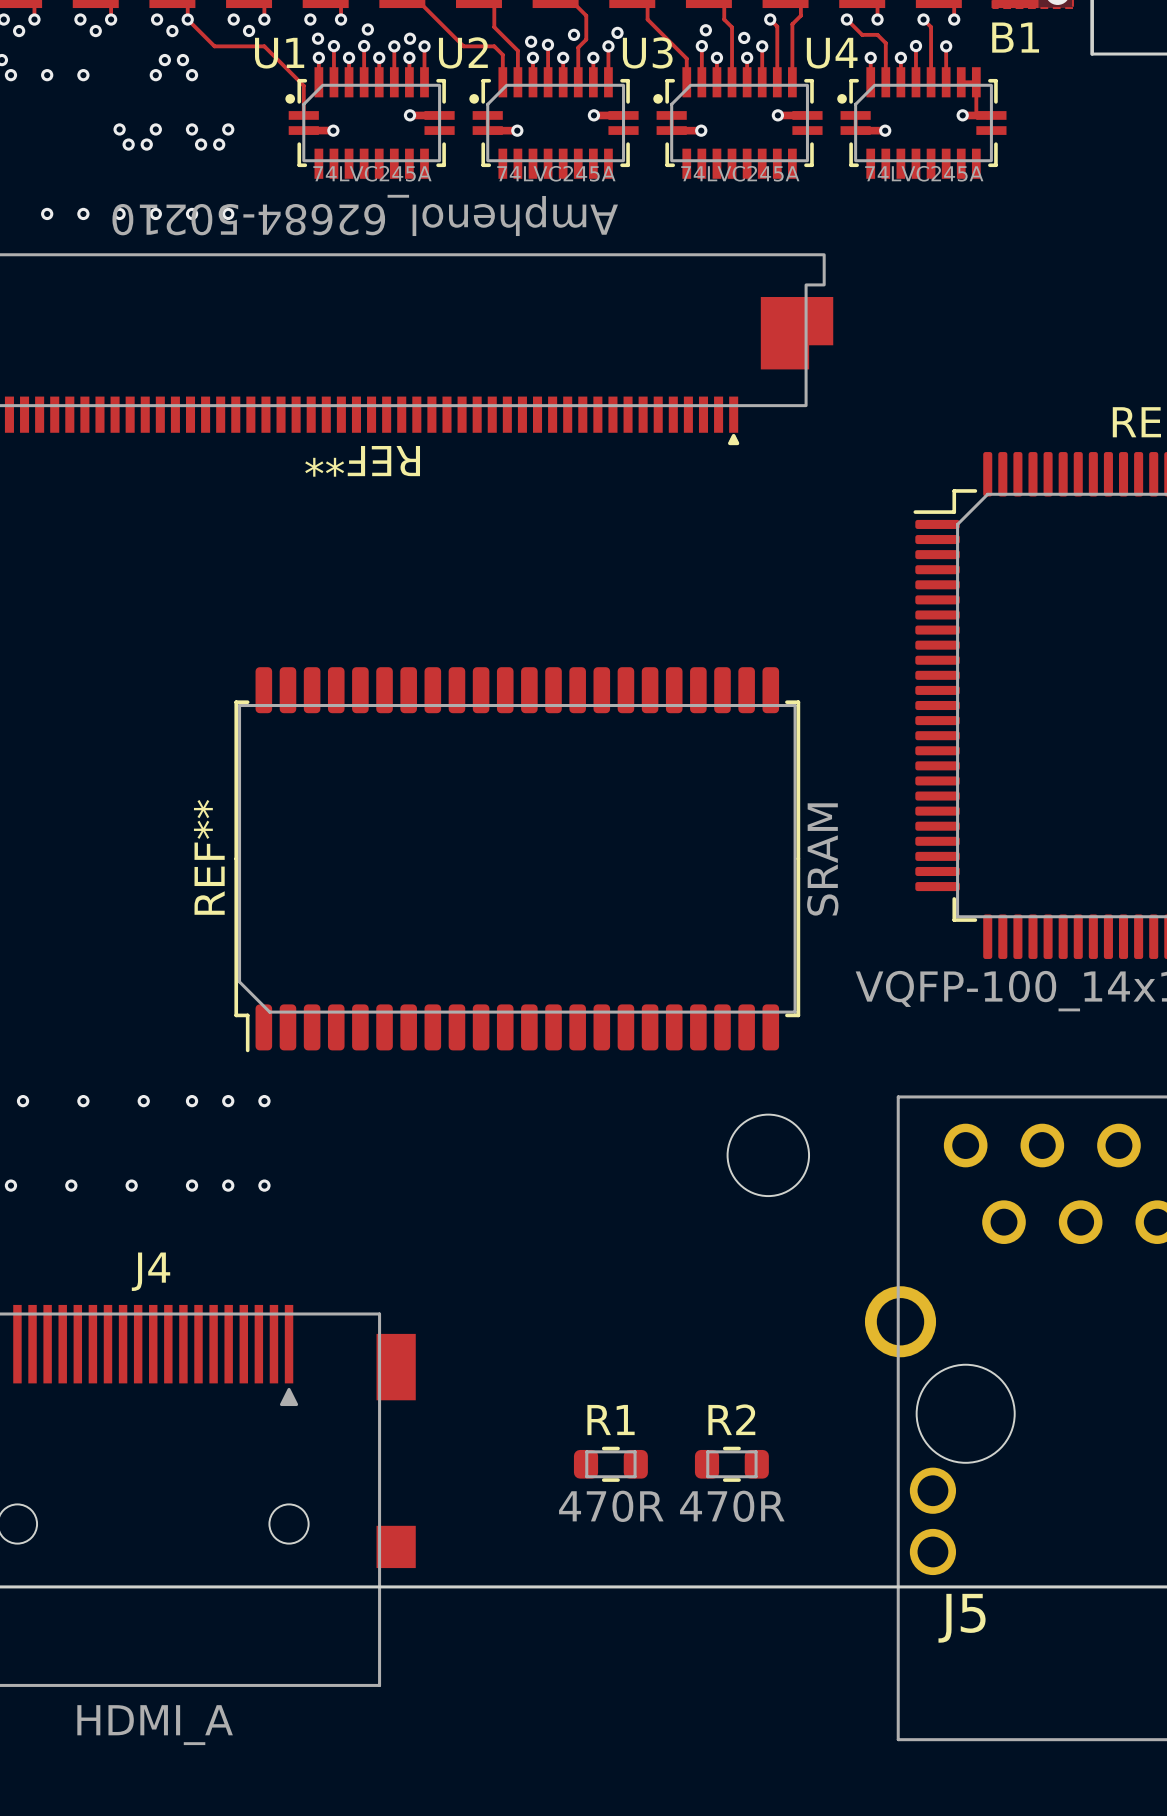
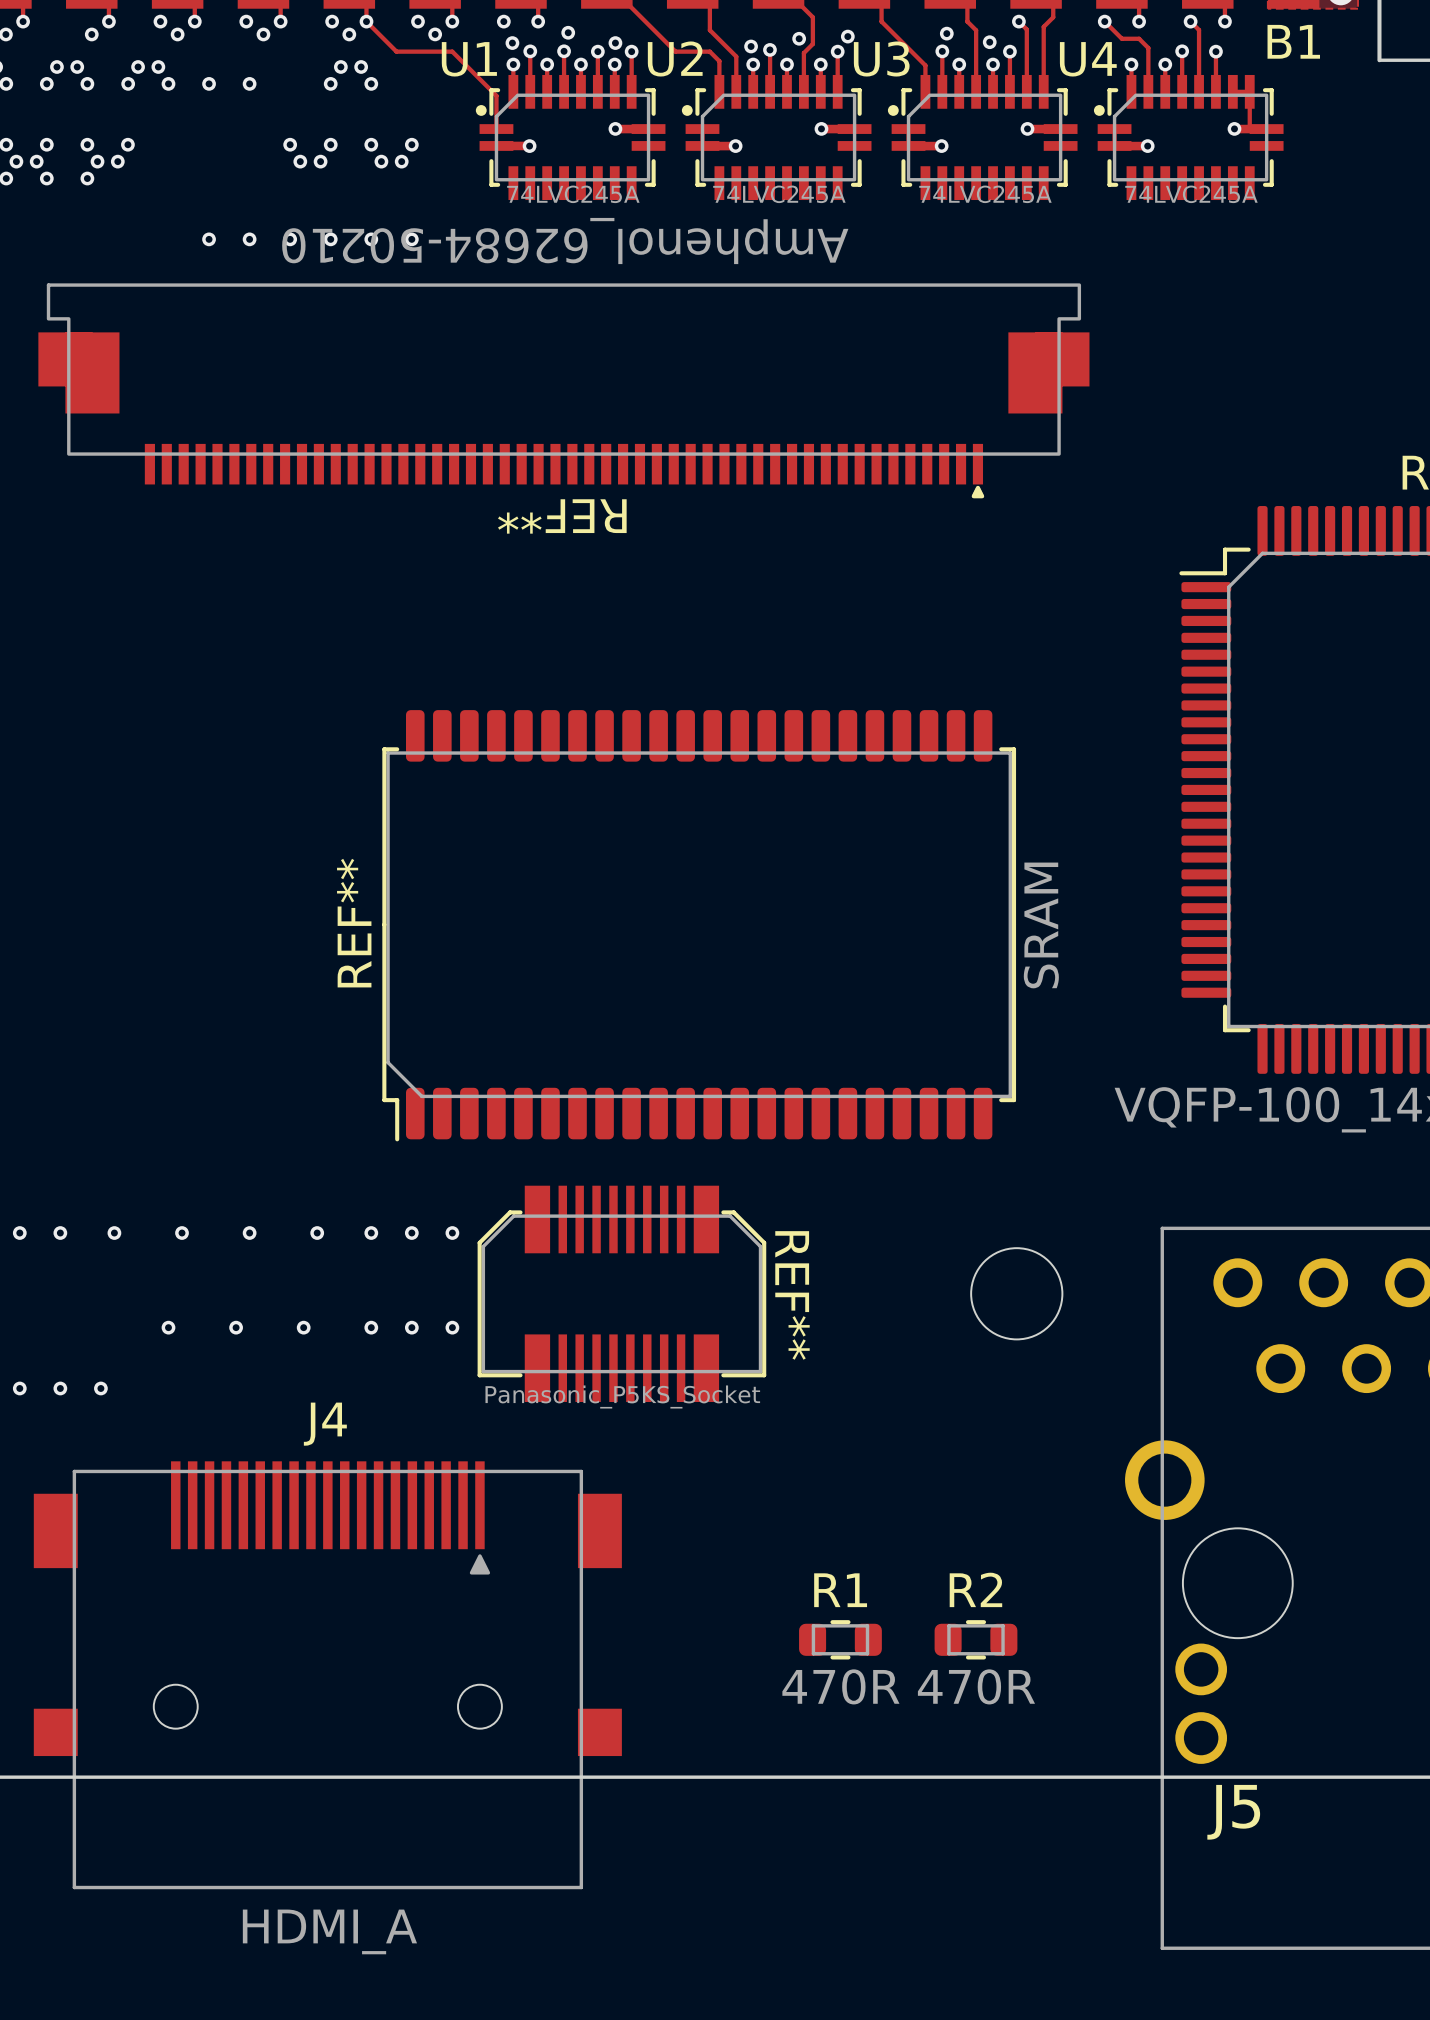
REF** position: (517, 859) -> (699, 925)
REF**: none -> Panasonic_P5KS_Socket (621, 1293)

